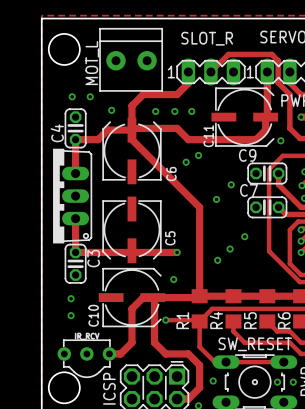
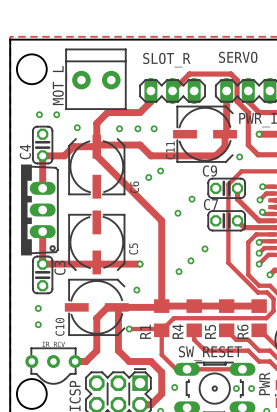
SLOT_R text: 1 (171, 72) -> none
SERVO text: 1 (250, 72) -> none

